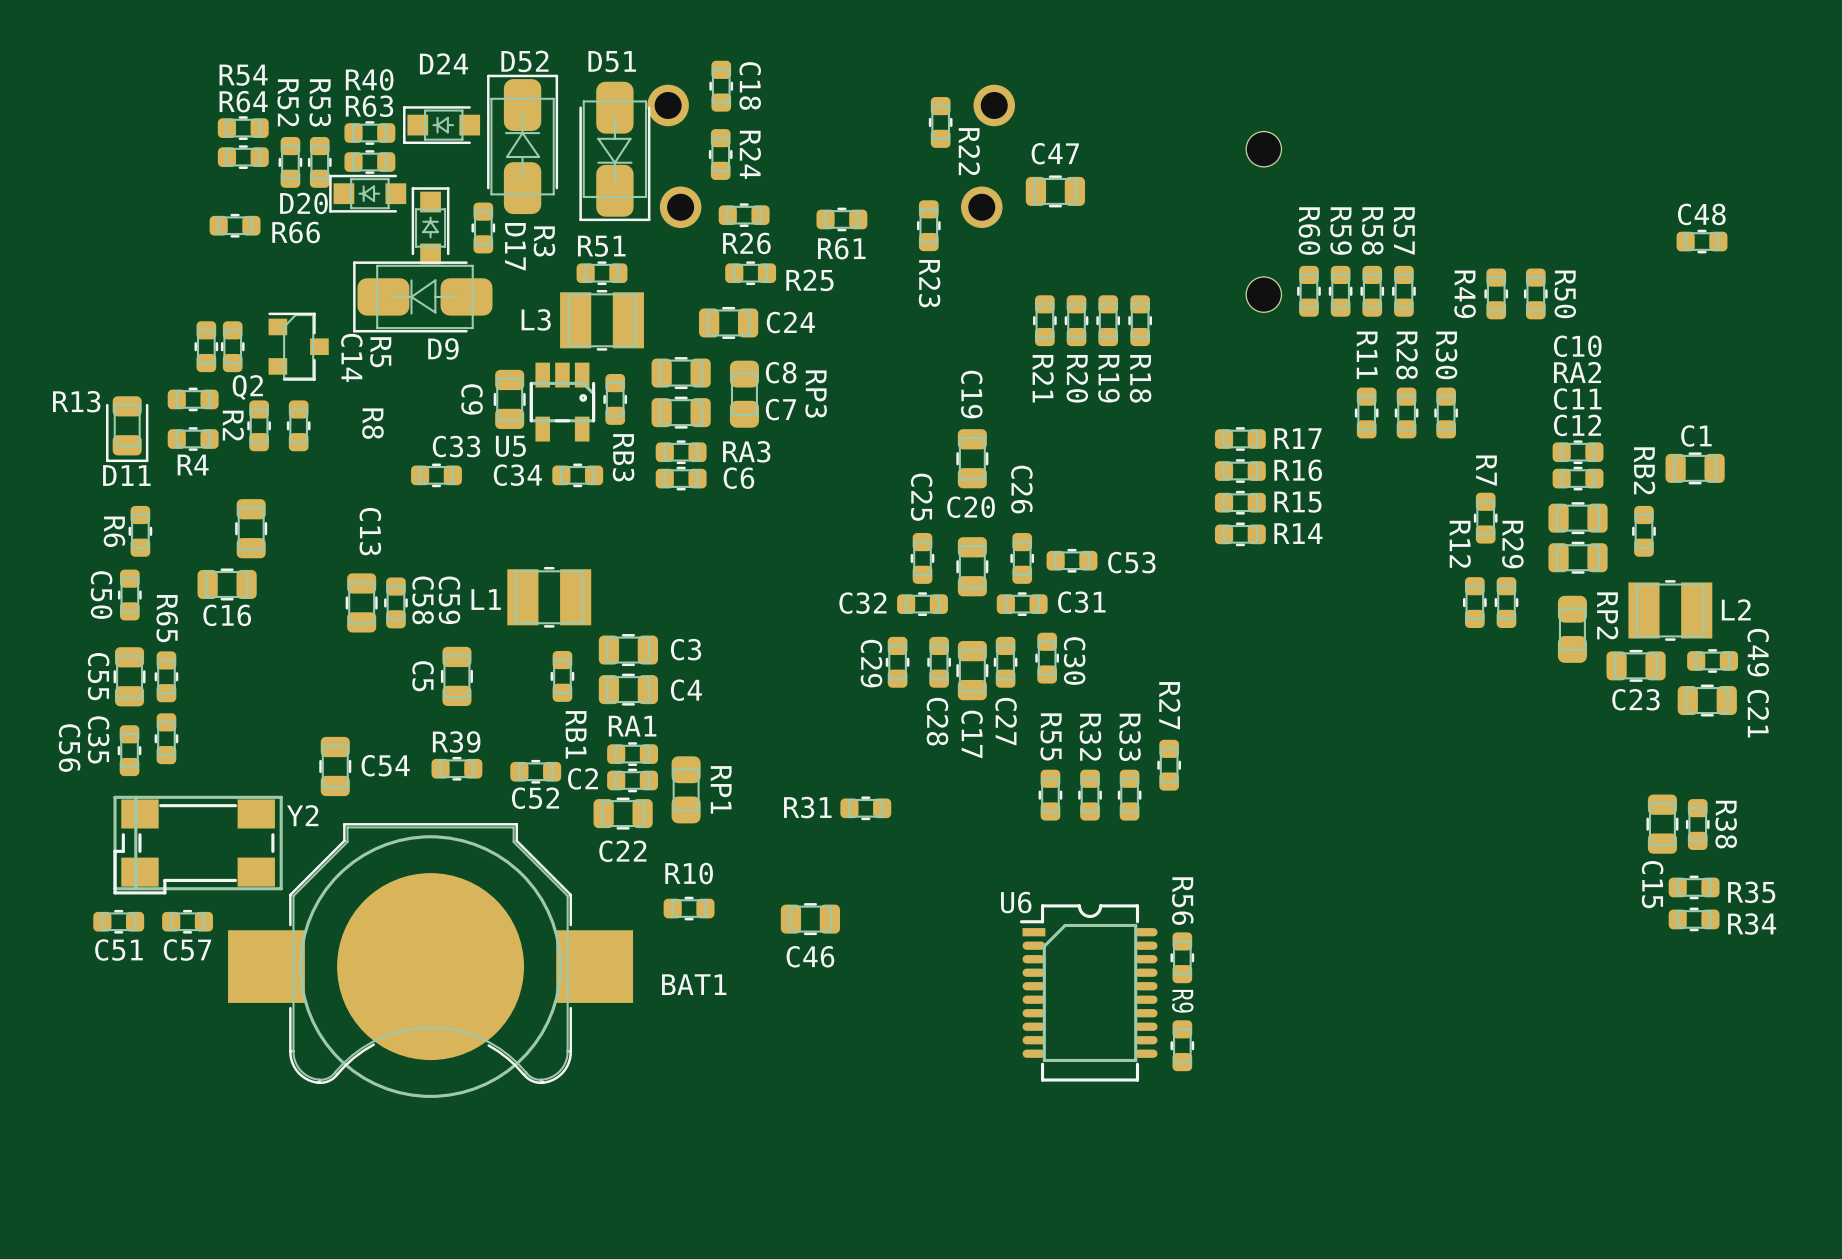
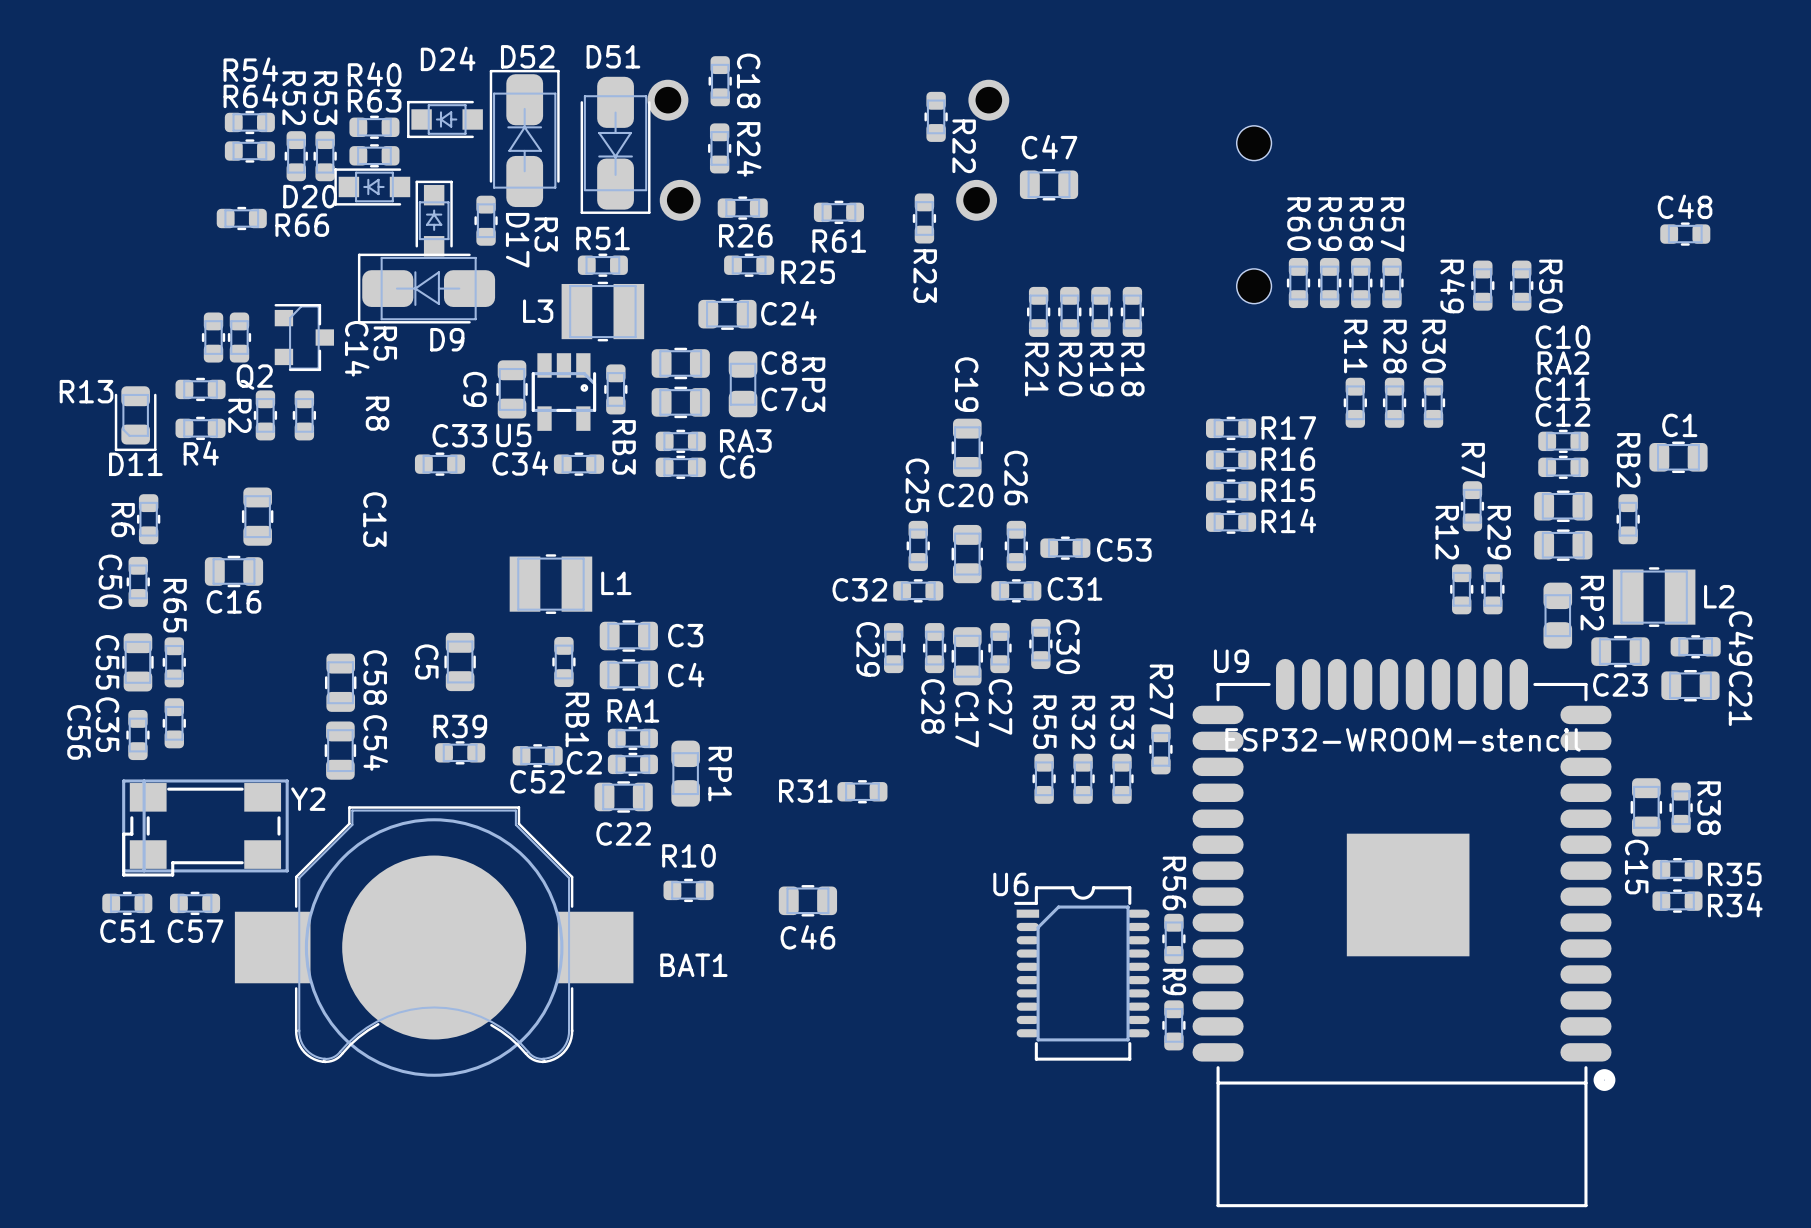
L1 name position: L1 (486, 599) -> L1 (616, 583)
C58 name position: C58 (423, 600) -> C58 (375, 677)
C58 position: (361, 602) -> (340, 682)
C59: (395, 602) -> none
C54 name rotation: 0° (385, 765) -> 90° clockwise (375, 742)
U9: none -> (1403, 933)

